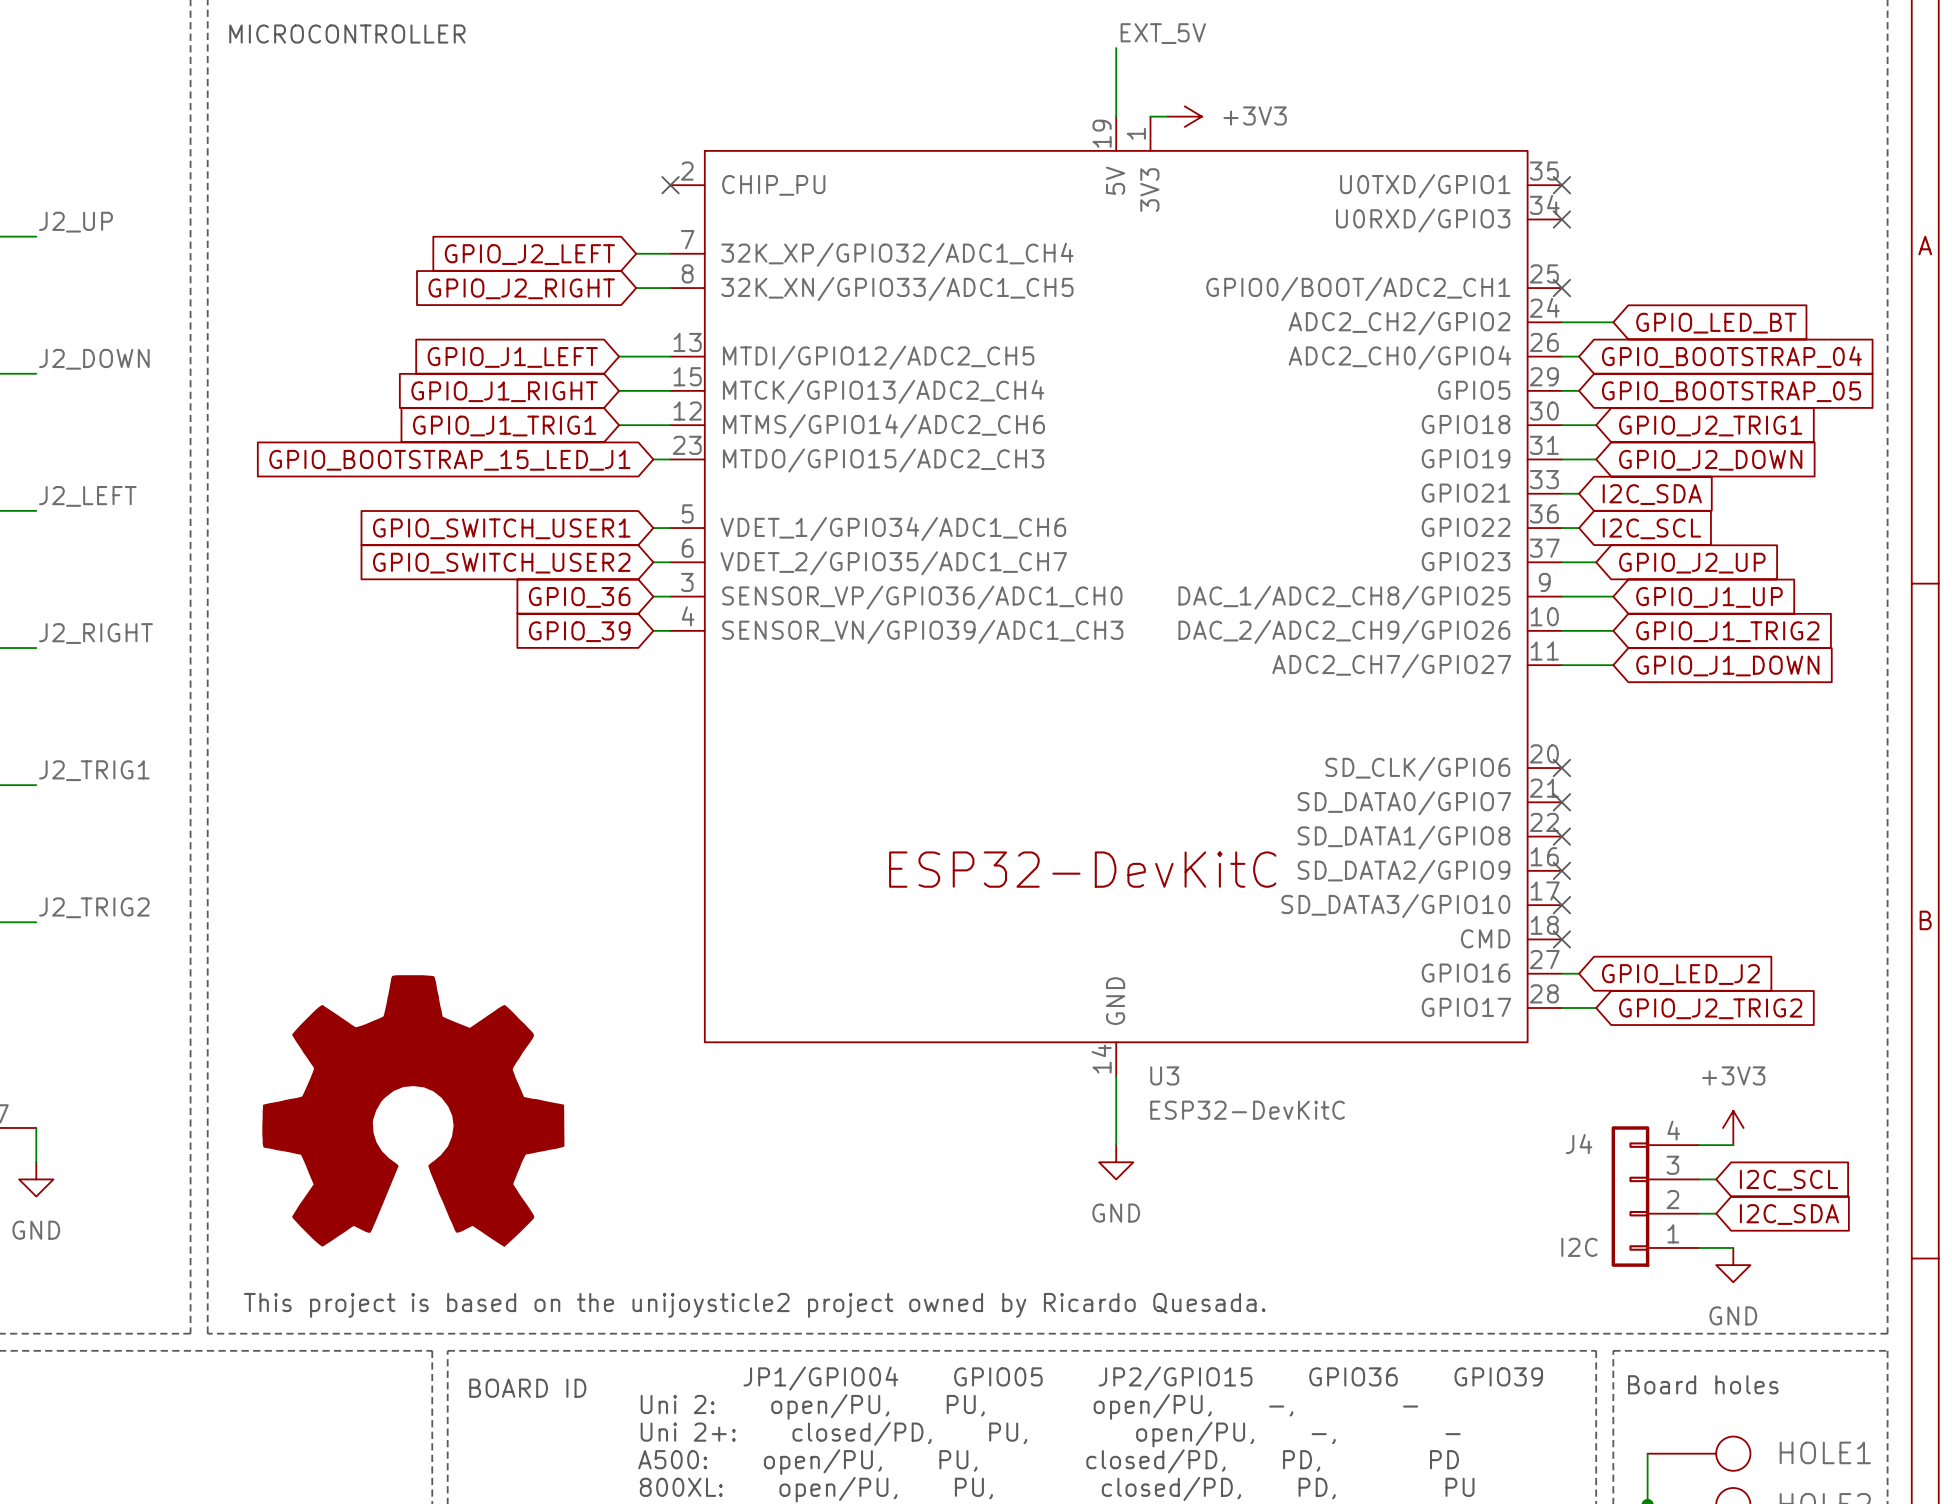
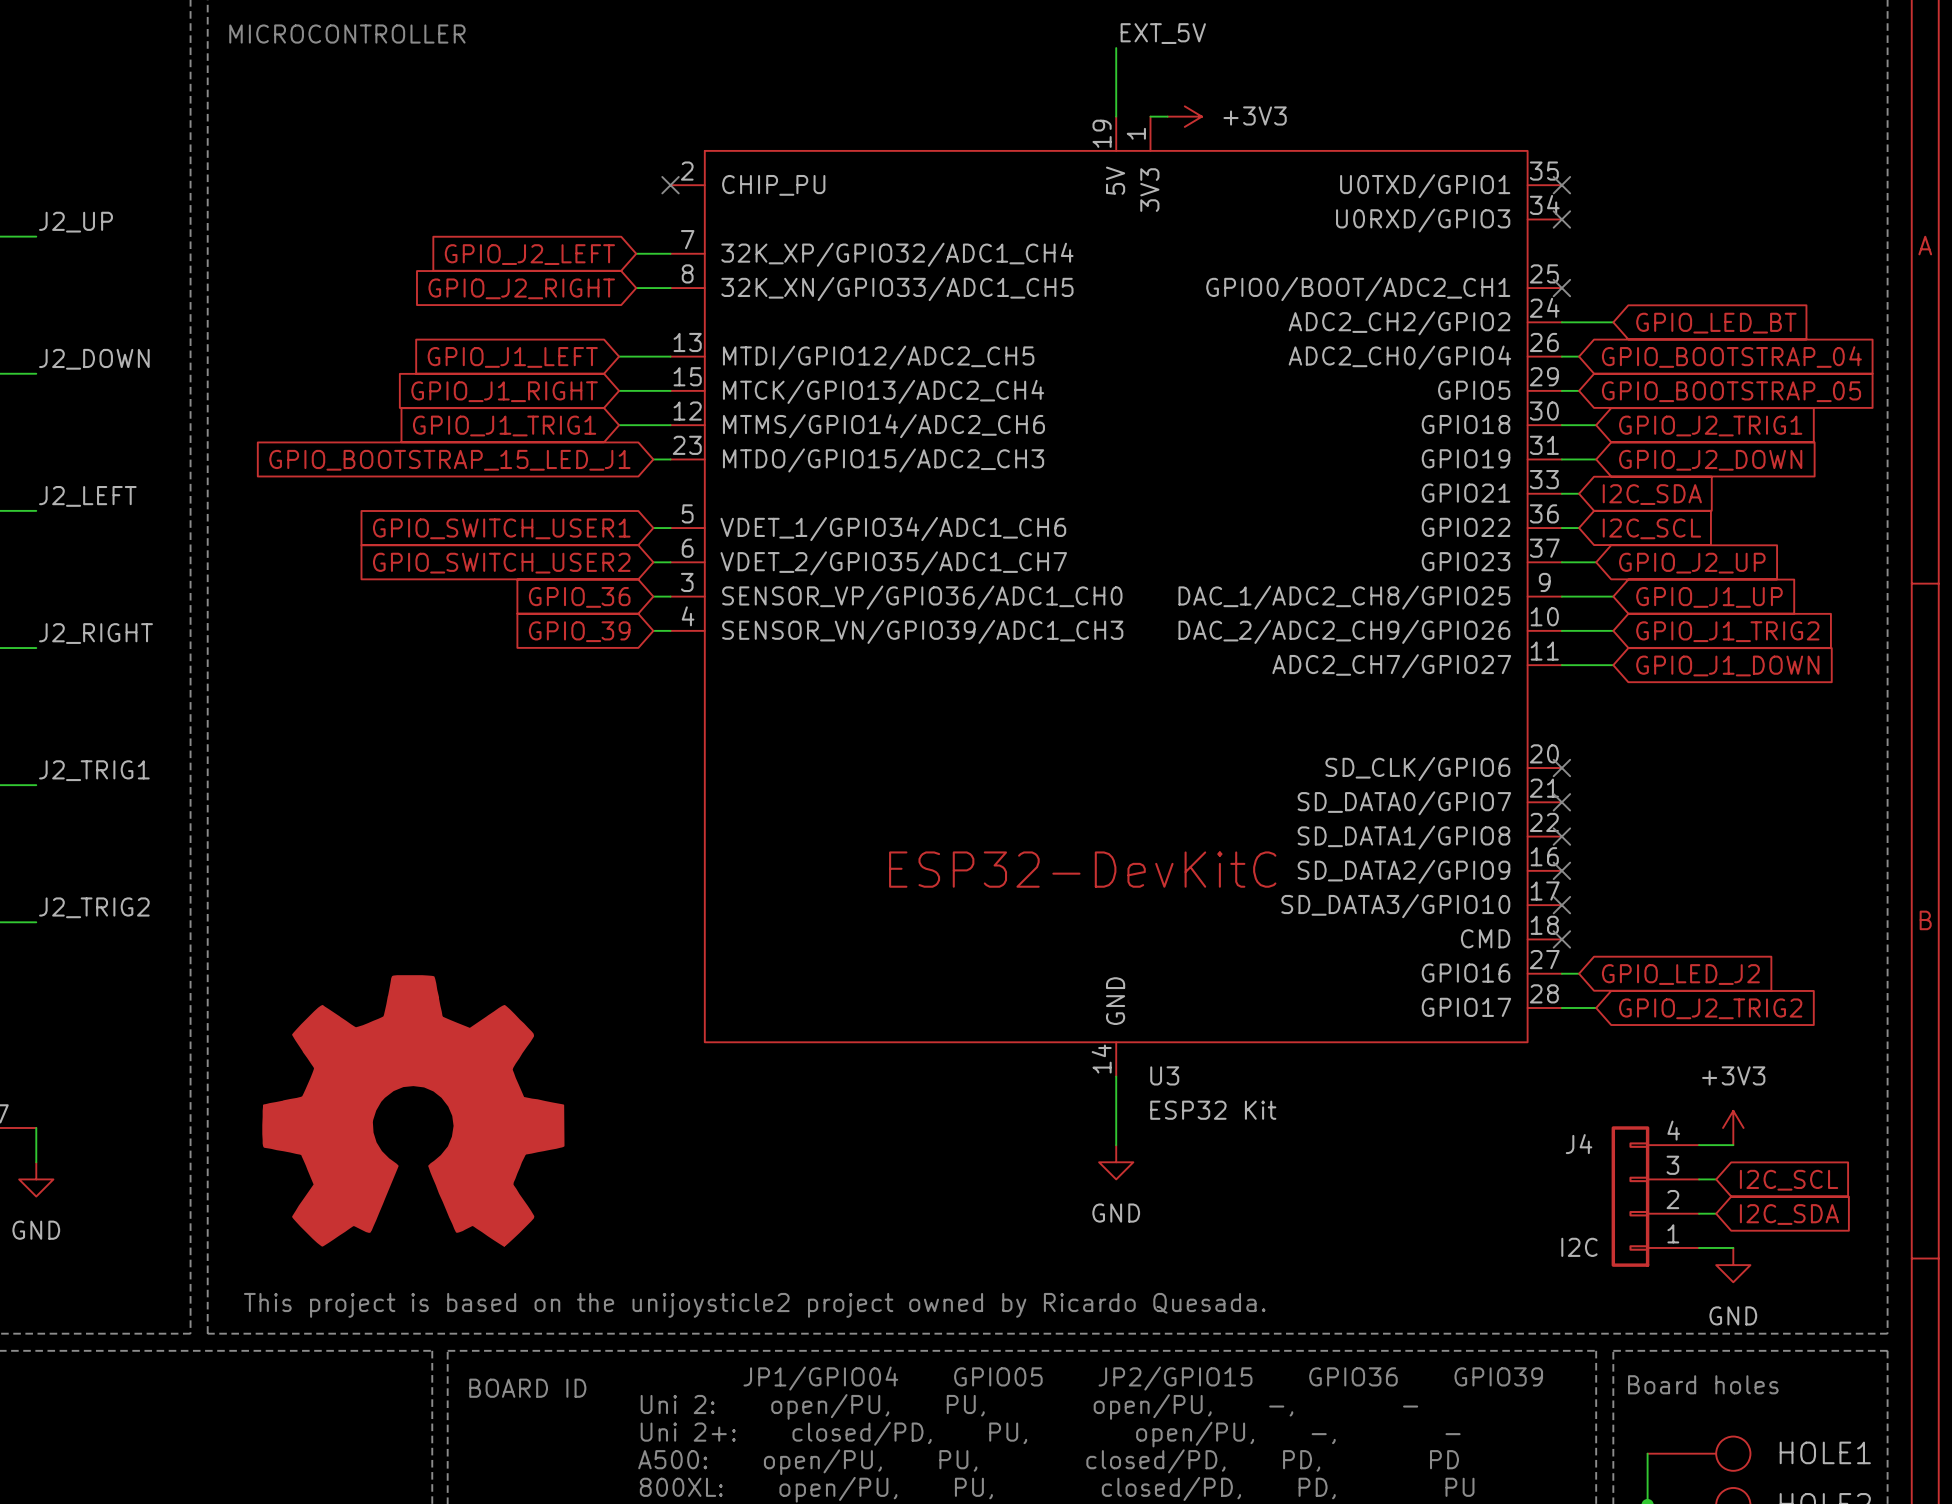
U3 value: ESP32-DevKitC (1247, 1110) -> ESP32 Kit (1213, 1110)

